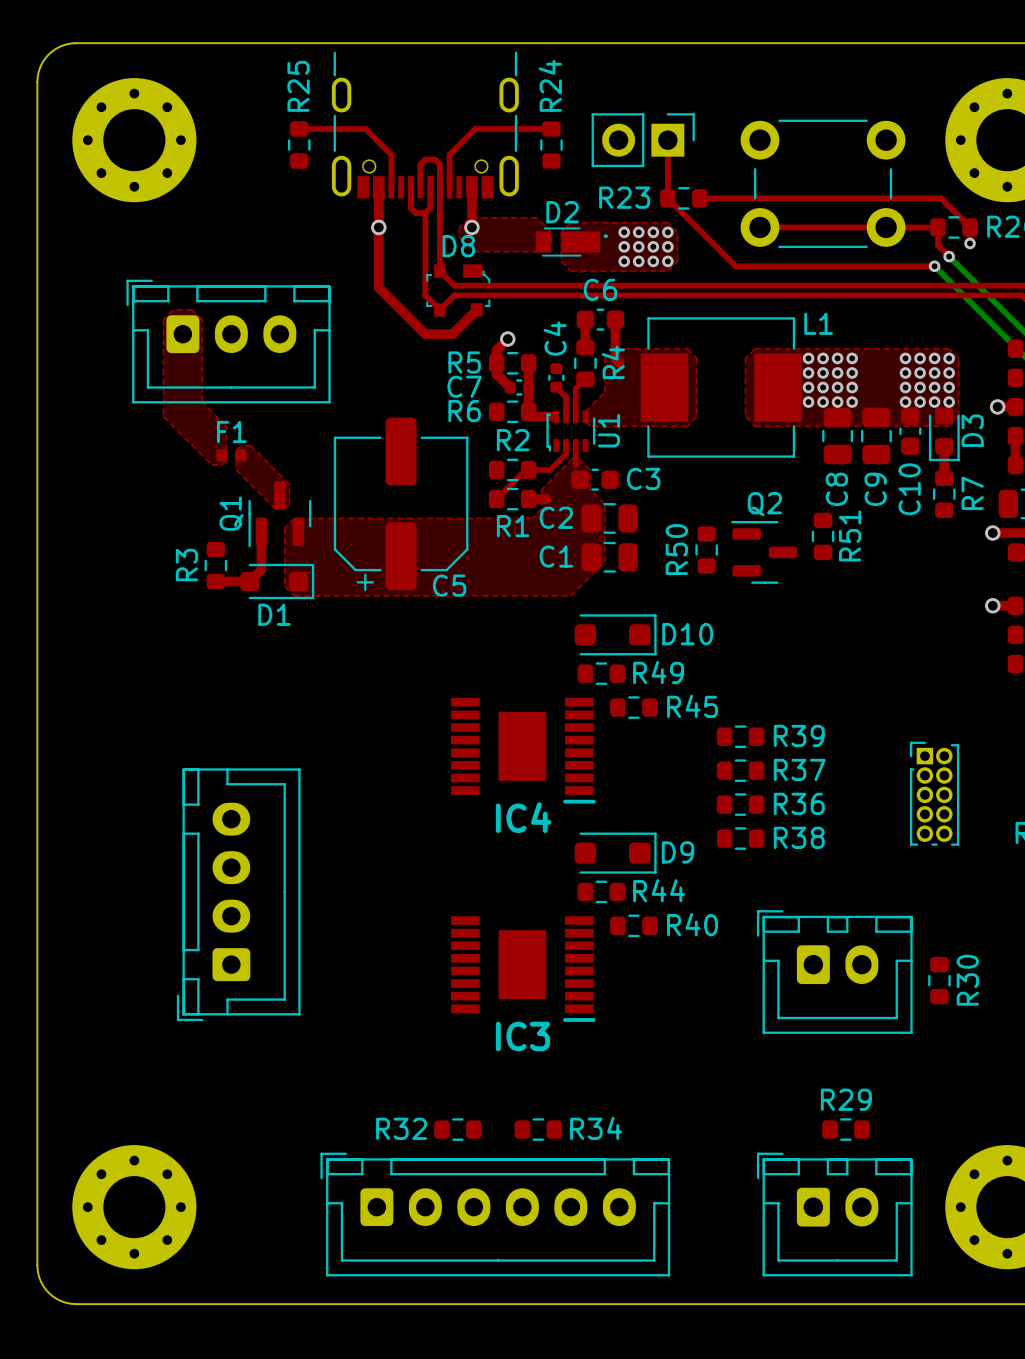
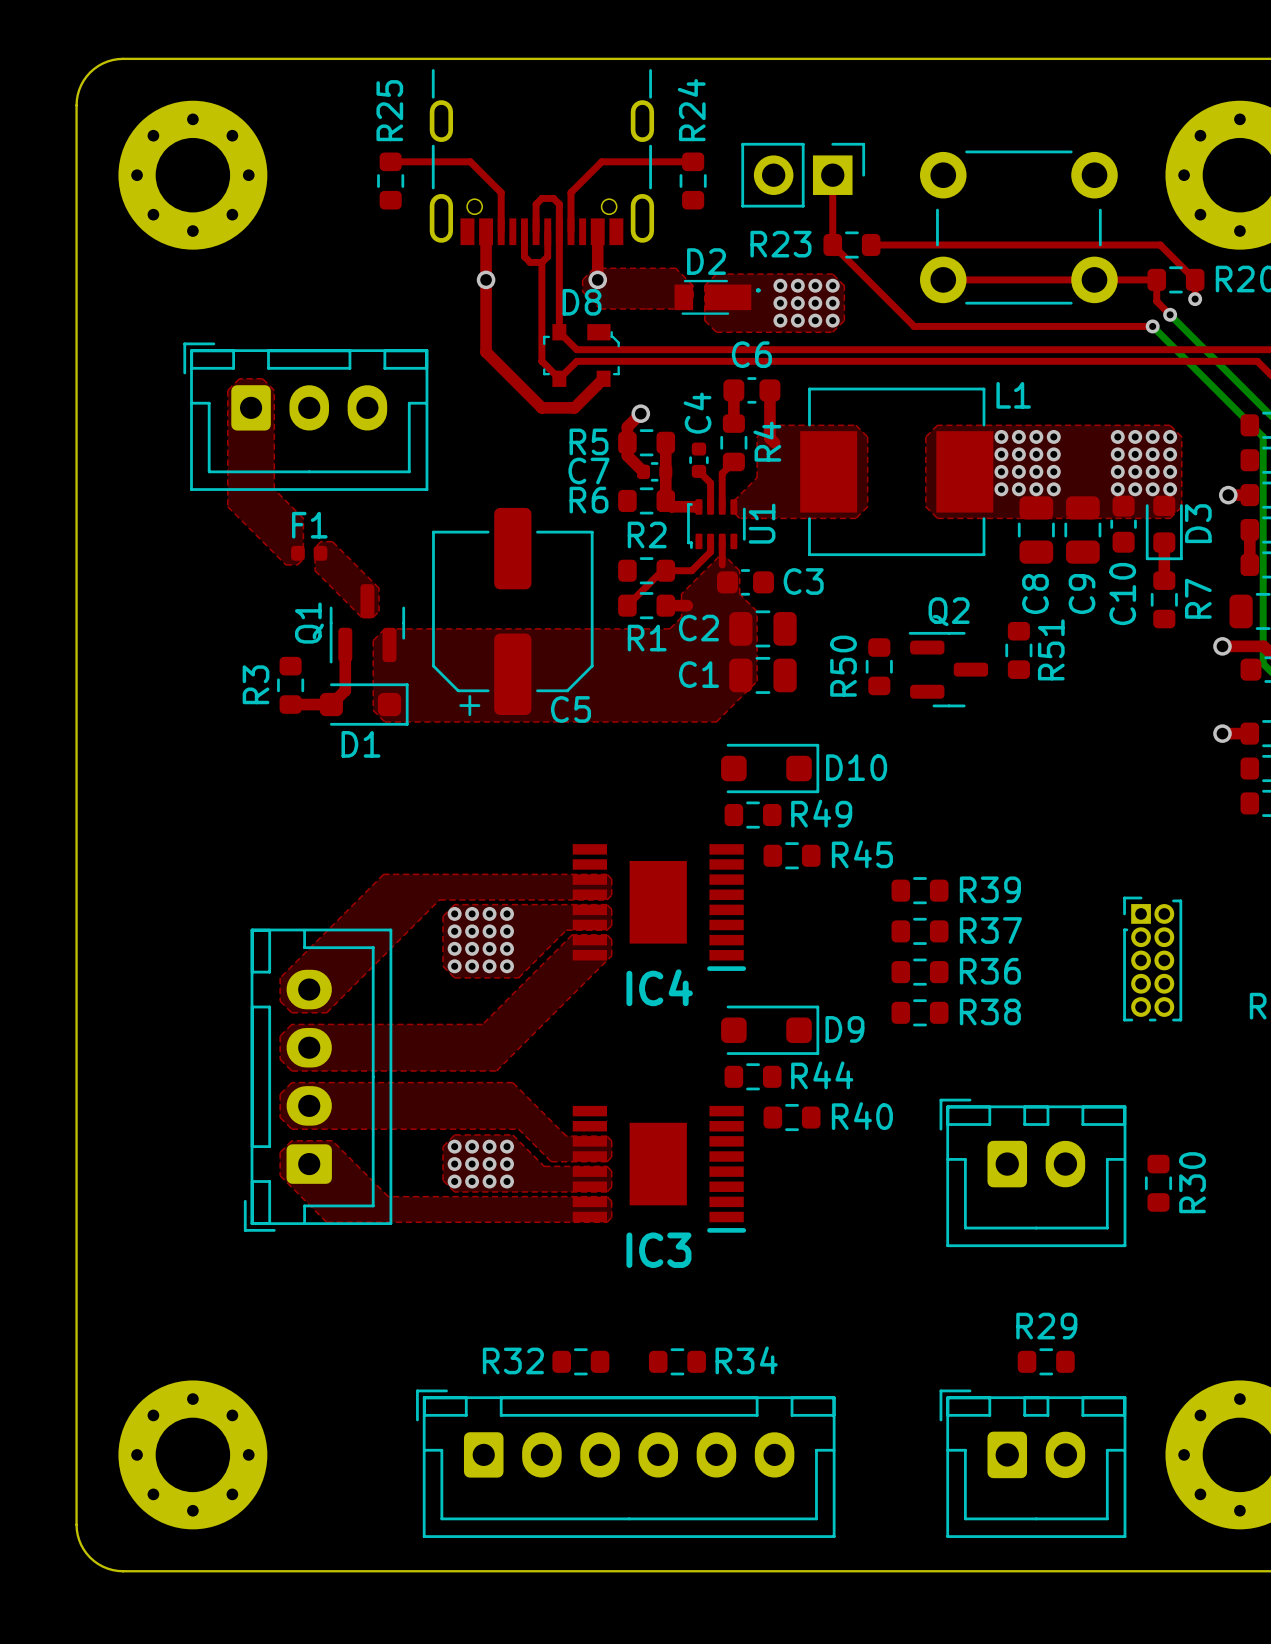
top zone outline: none -> (383, 874) (607, 874) (611, 879) (611, 895) (607, 899) (439, 899) (326, 1012) (291, 1012) (280, 1001) (280, 977) (383, 874)
top zone outline: none -> (454, 904) (443, 916) (443, 966) (454, 977) (518, 977) (566, 930) (607, 930) (611, 925) (611, 909) (607, 904) (454, 904)
via: none -> (454, 913)
via: none -> (472, 913)
via: none -> (489, 913)
via: none -> (507, 913)
via: none -> (454, 931)
via: none -> (472, 931)
via: none -> (489, 931)
via: none -> (507, 931)
top zone outline: none -> (572, 934) (607, 934) (611, 939) (611, 955) (496, 1070) (291, 1070) (280, 1059) (280, 1036) (291, 1024) (482, 1024) (572, 934)
via: none -> (454, 948)
via: none -> (472, 948)
via: none -> (489, 948)
via: none -> (507, 948)
via: none -> (454, 966)
via: none -> (472, 966)
via: none -> (489, 966)
via: none -> (507, 966)
top zone outline: none -> (291, 1082) (280, 1094) (280, 1117) (291, 1129) (518, 1129) (551, 1161) (607, 1161) (611, 1157) (611, 1140) (607, 1136) (566, 1136) (512, 1082) (291, 1082)
top zone outline: none -> (454, 1134) (443, 1146) (443, 1180) (454, 1191) (607, 1191) (611, 1187) (611, 1171) (607, 1166) (544, 1166) (512, 1134) (454, 1134)
top zone outline: none -> (291, 1140) (280, 1152) (280, 1175) (326, 1222) (607, 1222) (611, 1217) (611, 1201) (607, 1196) (388, 1196) (332, 1140) (291, 1140)
via: none -> (454, 1146)
via: none -> (472, 1146)
via: none -> (489, 1146)
via: none -> (507, 1146)
via: none -> (454, 1164)
via: none -> (472, 1164)
via: none -> (489, 1164)
via: none -> (507, 1164)
via: none -> (454, 1181)
via: none -> (472, 1181)
via: none -> (489, 1181)
via: none -> (507, 1181)

